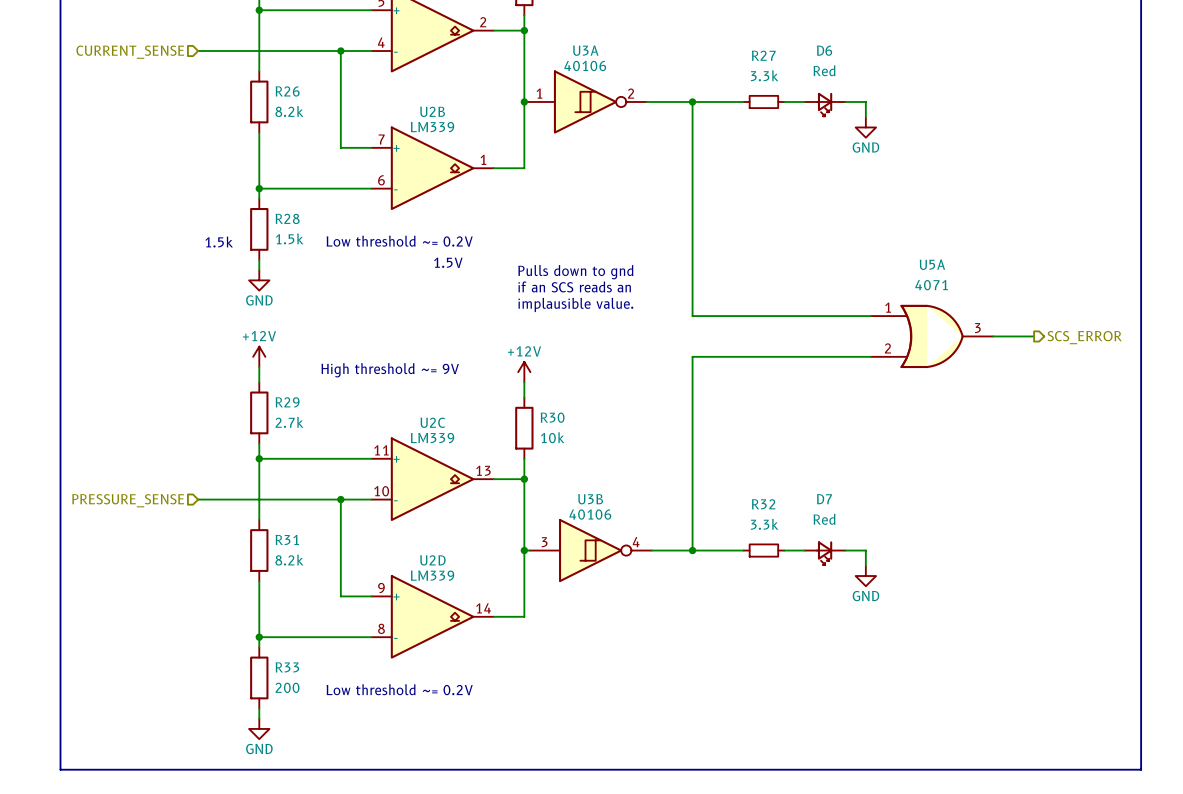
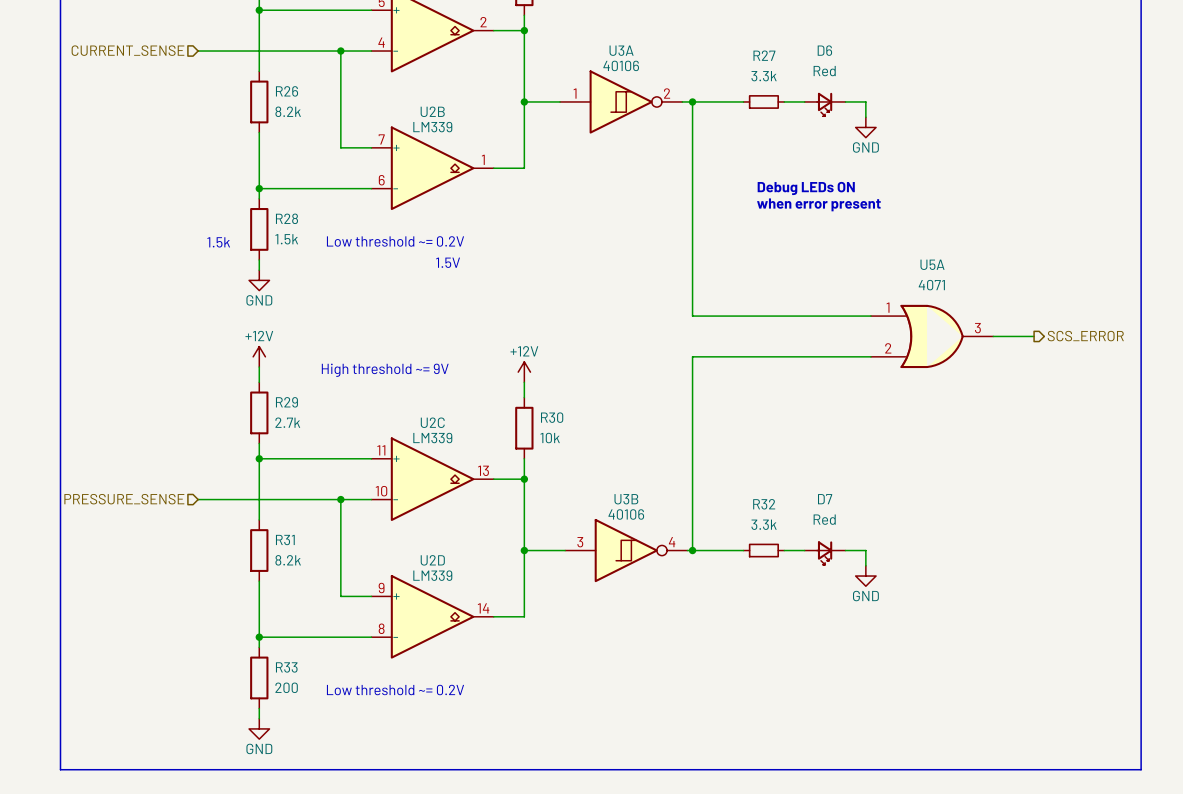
U3A position: (585, 101) -> (621, 101)
text: none -> Debug LEDs ON (806, 188)
text: none -> when error present (818, 204)
text: Pulls down to gnd (575, 272) -> none
text: if an SCS reads an (574, 286) -> none
text: implausible value. (575, 304) -> none
U3B position: (590, 550) -> (626, 550)

